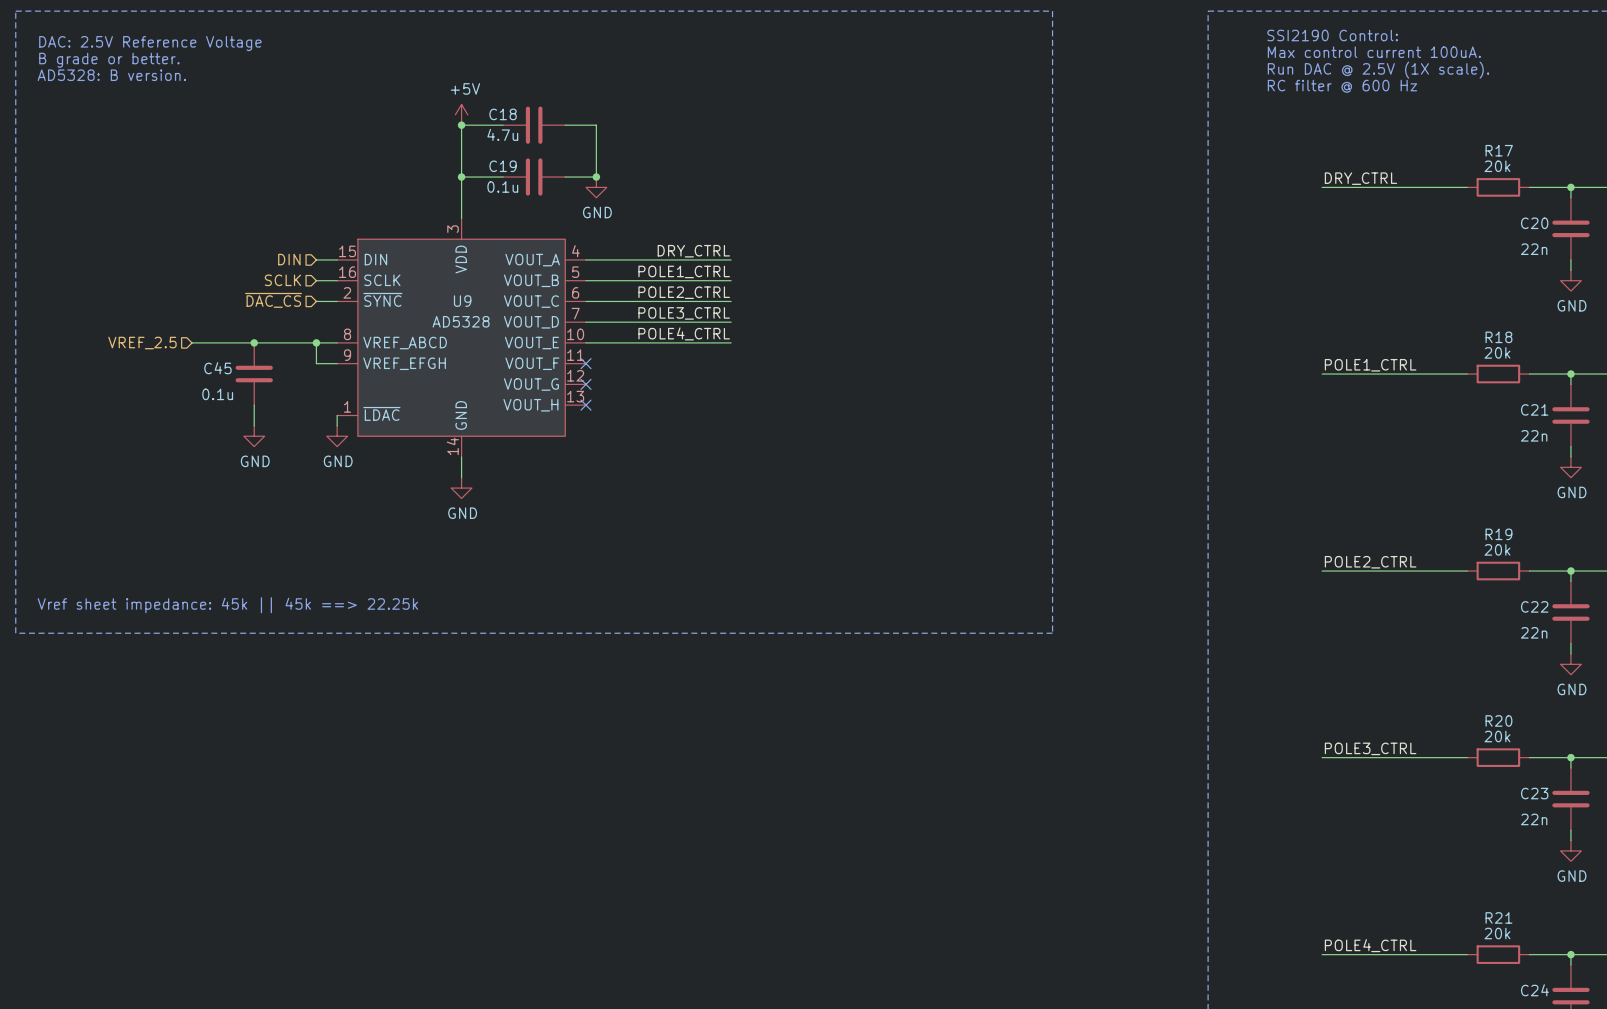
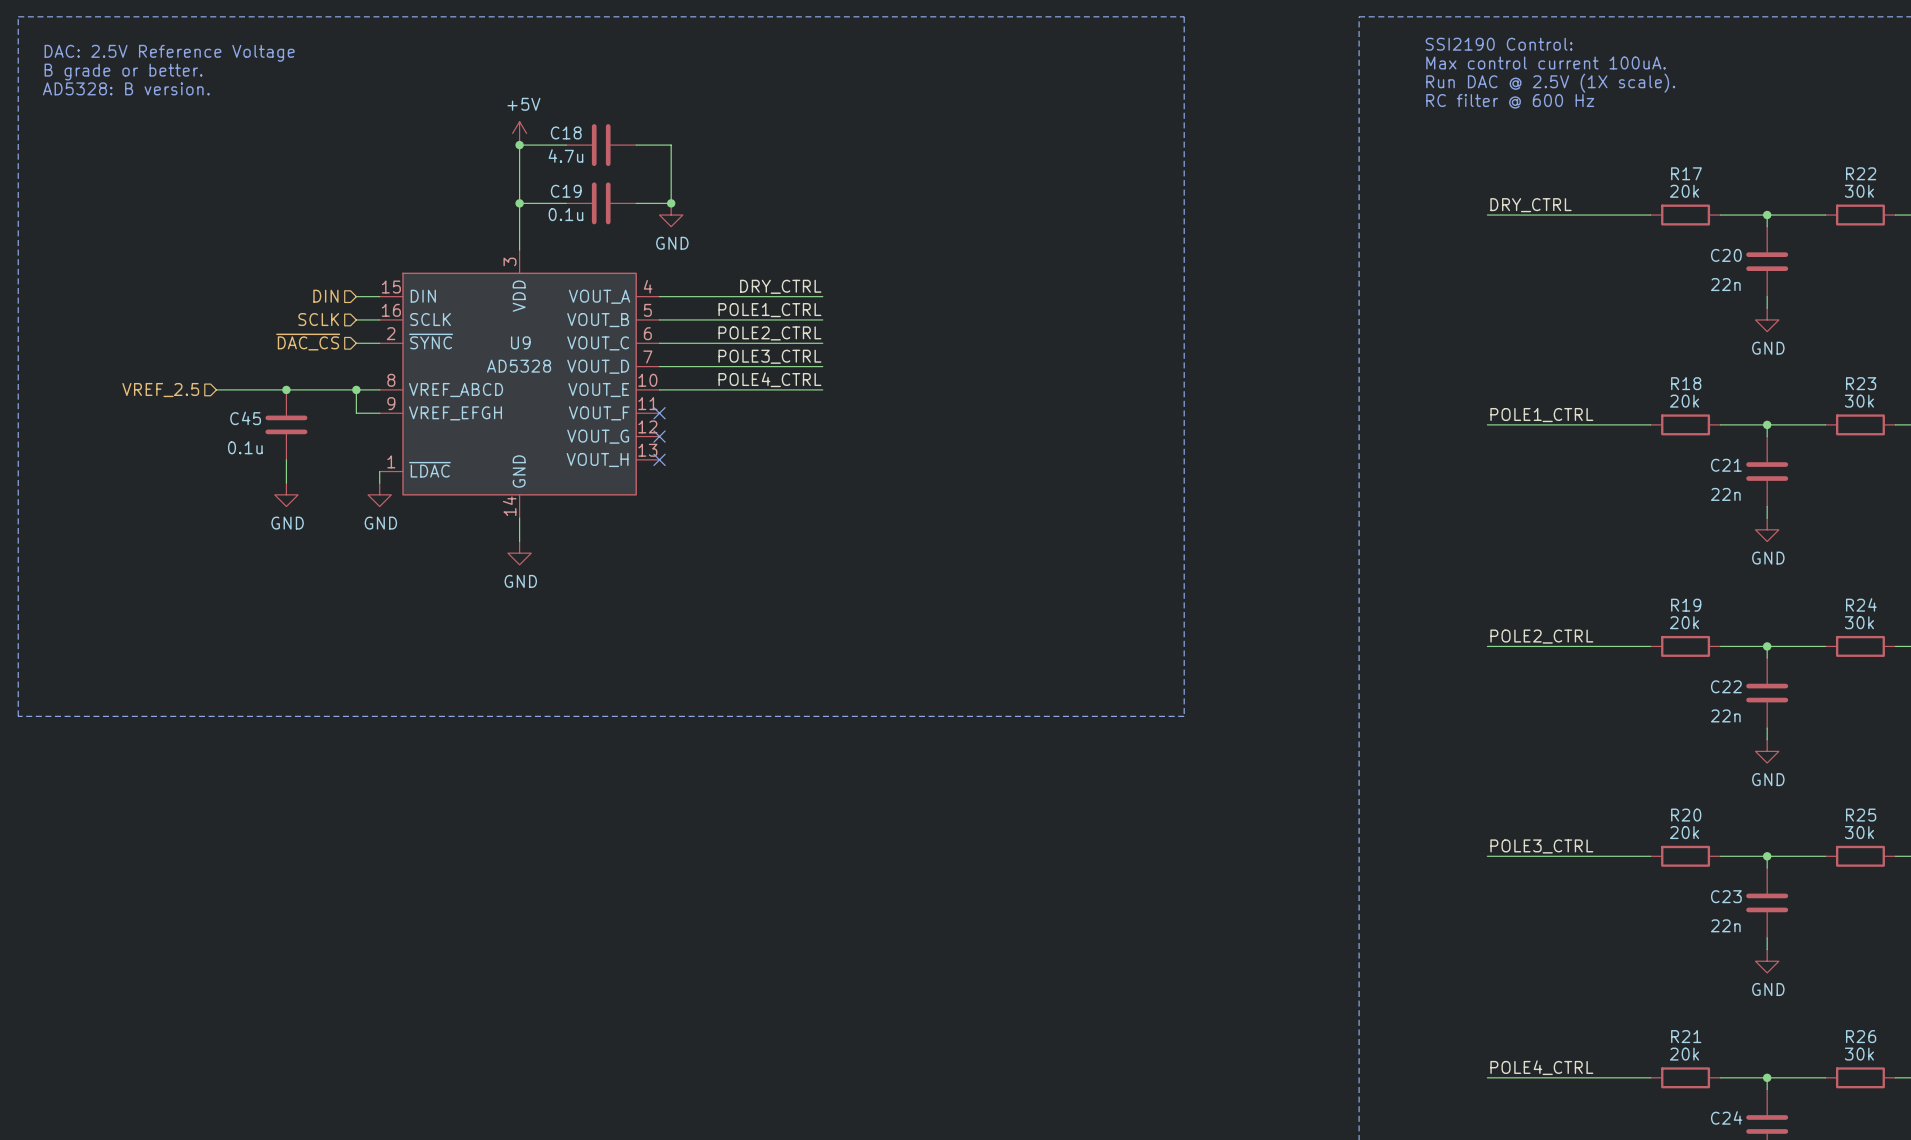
text: Vref sheet impedance: 45k || 45k ==> 22.25k (227, 605) -> none

